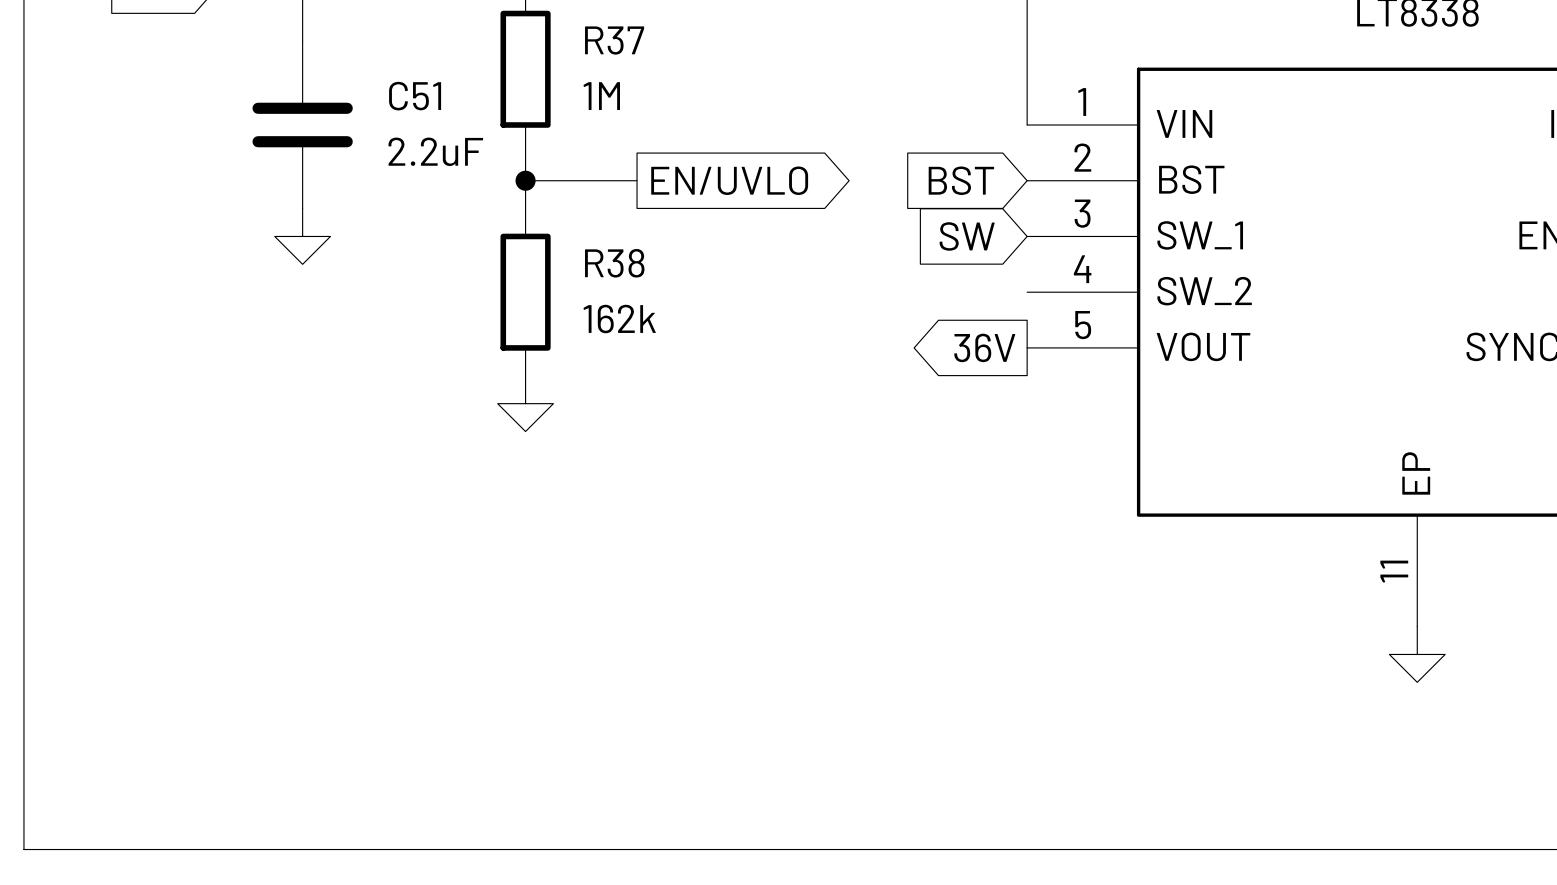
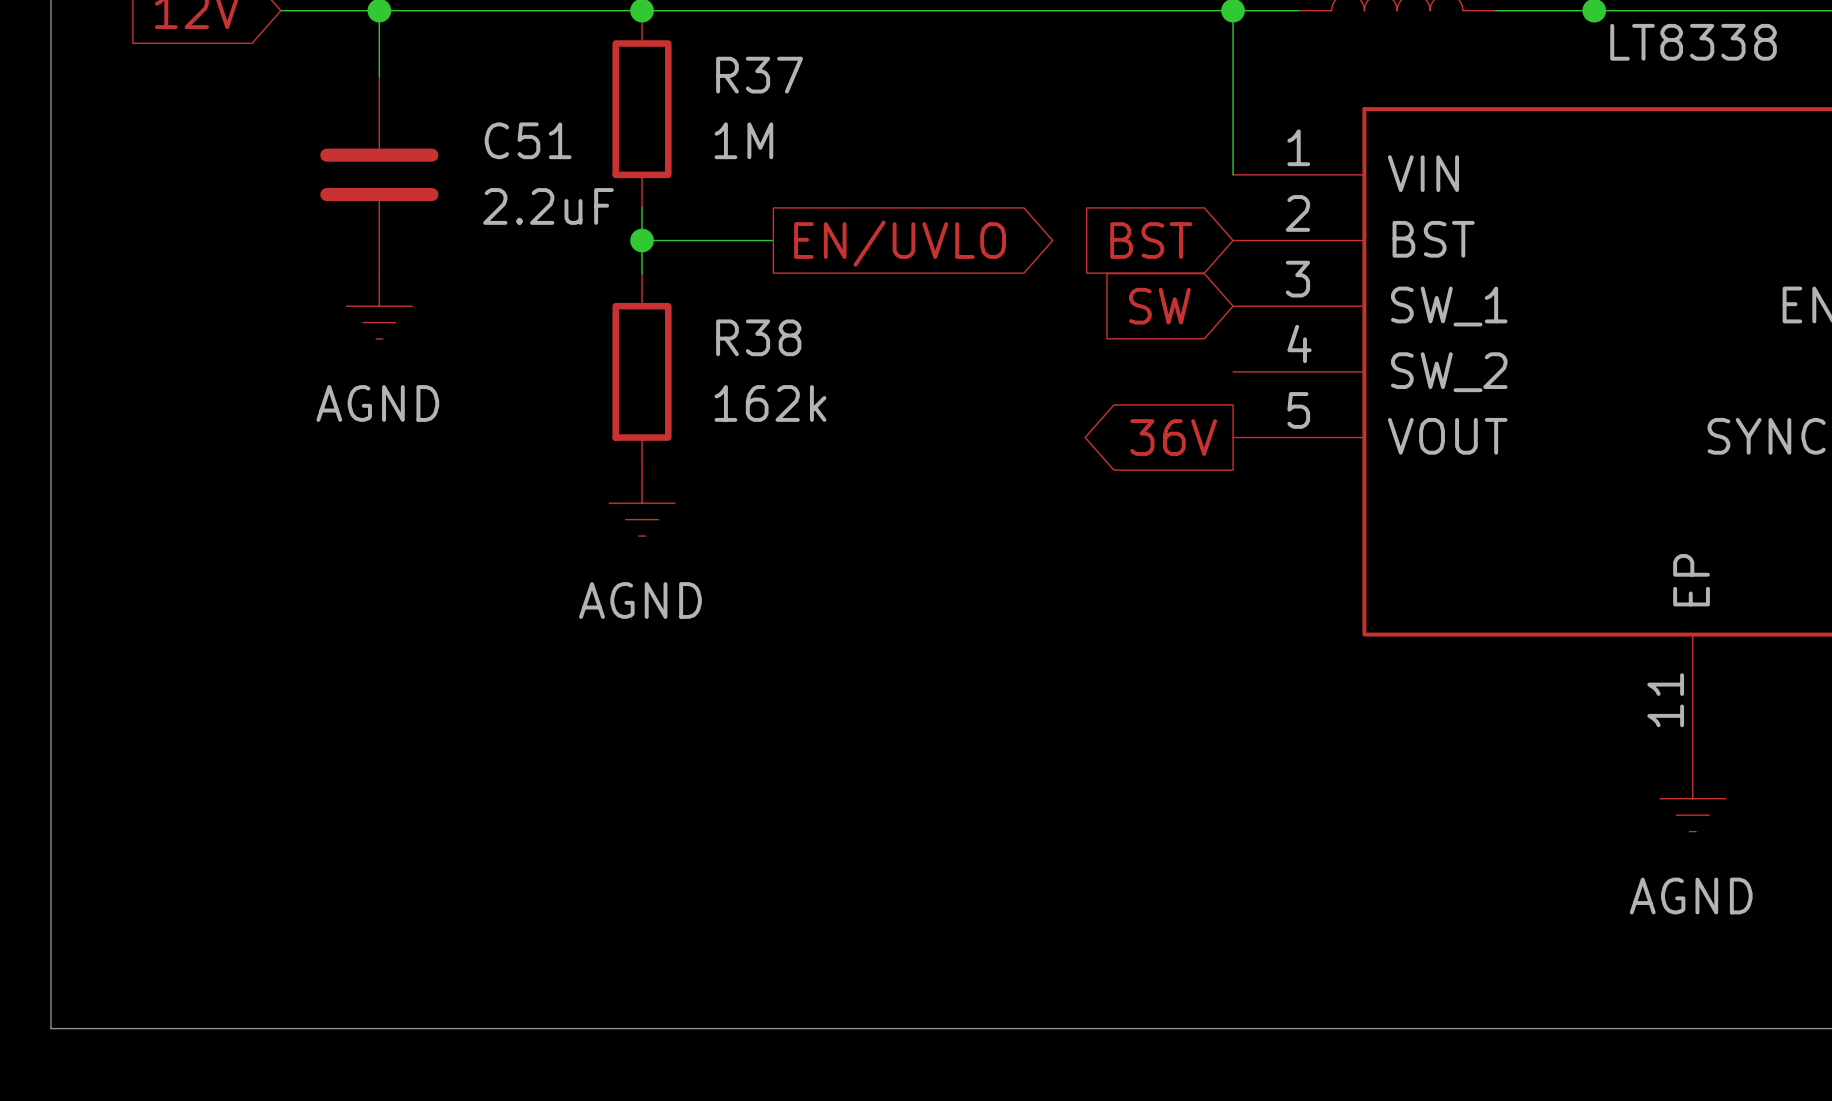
power symbol shape: [274, 208, 331, 265] -> [346, 273, 413, 340]
power symbol text: none -> AGND (377, 403)
power symbol shape: [497, 375, 554, 432] -> [609, 470, 675, 537]
power symbol text: none -> AGND (640, 600)
power symbol shape: [1389, 626, 1446, 683] -> [1659, 765, 1726, 832]
power symbol text: none -> AGND (1691, 896)

